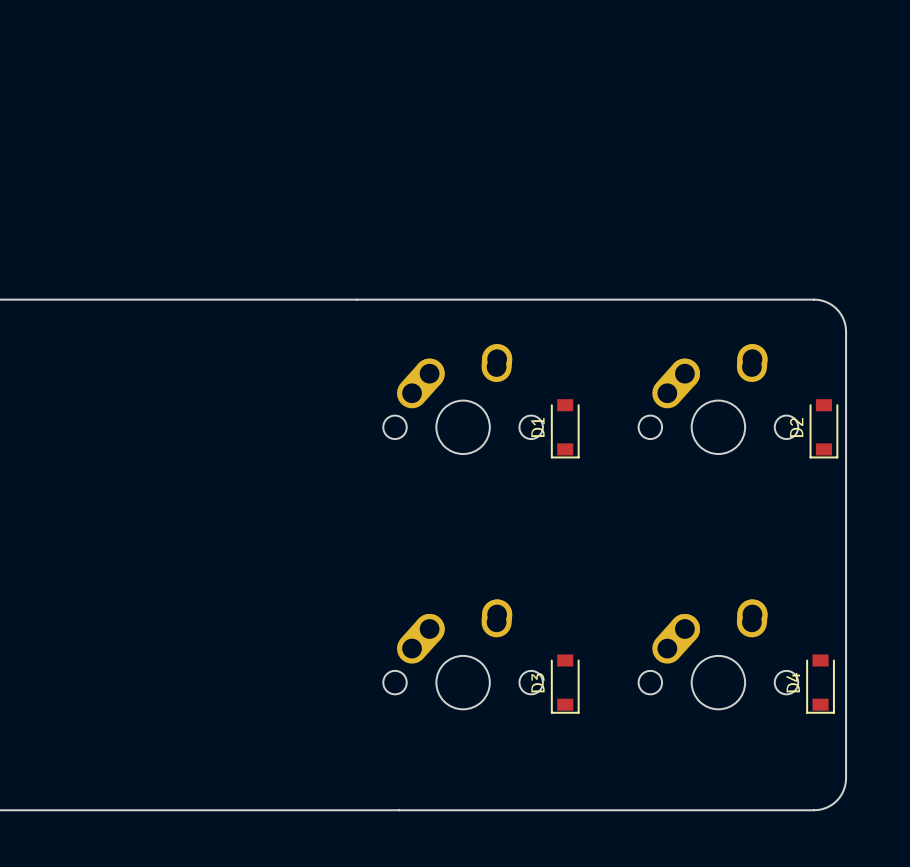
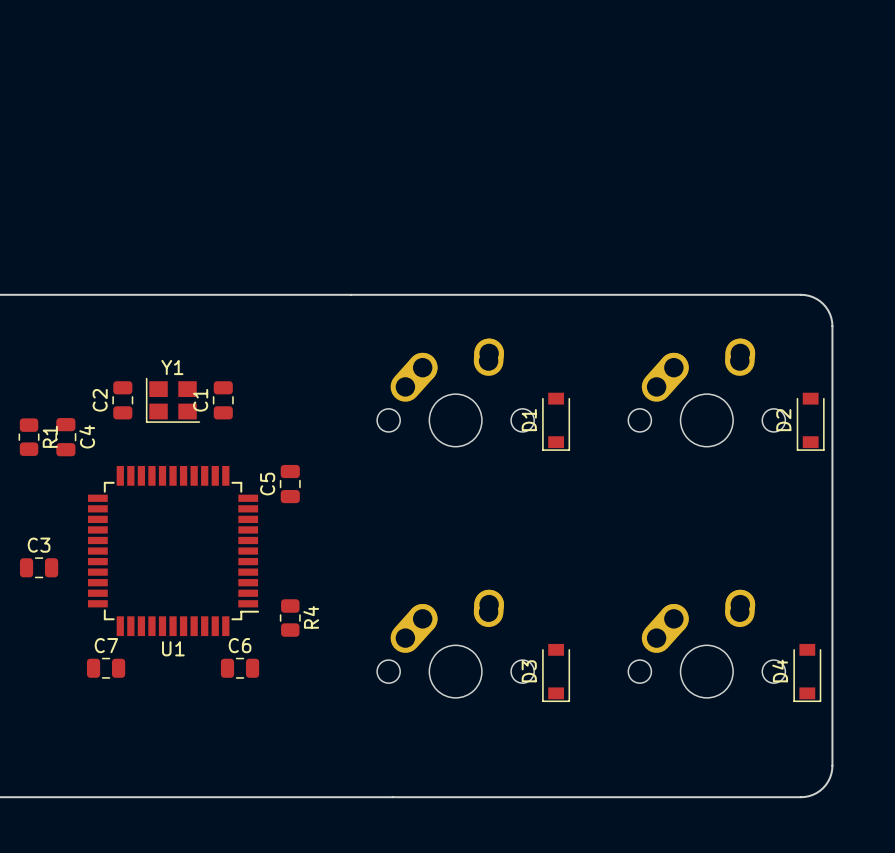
C2: none -> (122, 400)
Y1: none -> (173, 400)
C1: none -> (223, 400)
R1: none -> (29, 437)
C4: none -> (65, 437)
C5: none -> (290, 484)
U1: none -> (173, 551)
C3: none -> (39, 567)
R4: none -> (290, 618)
C7: none -> (106, 668)
C6: none -> (240, 668)

